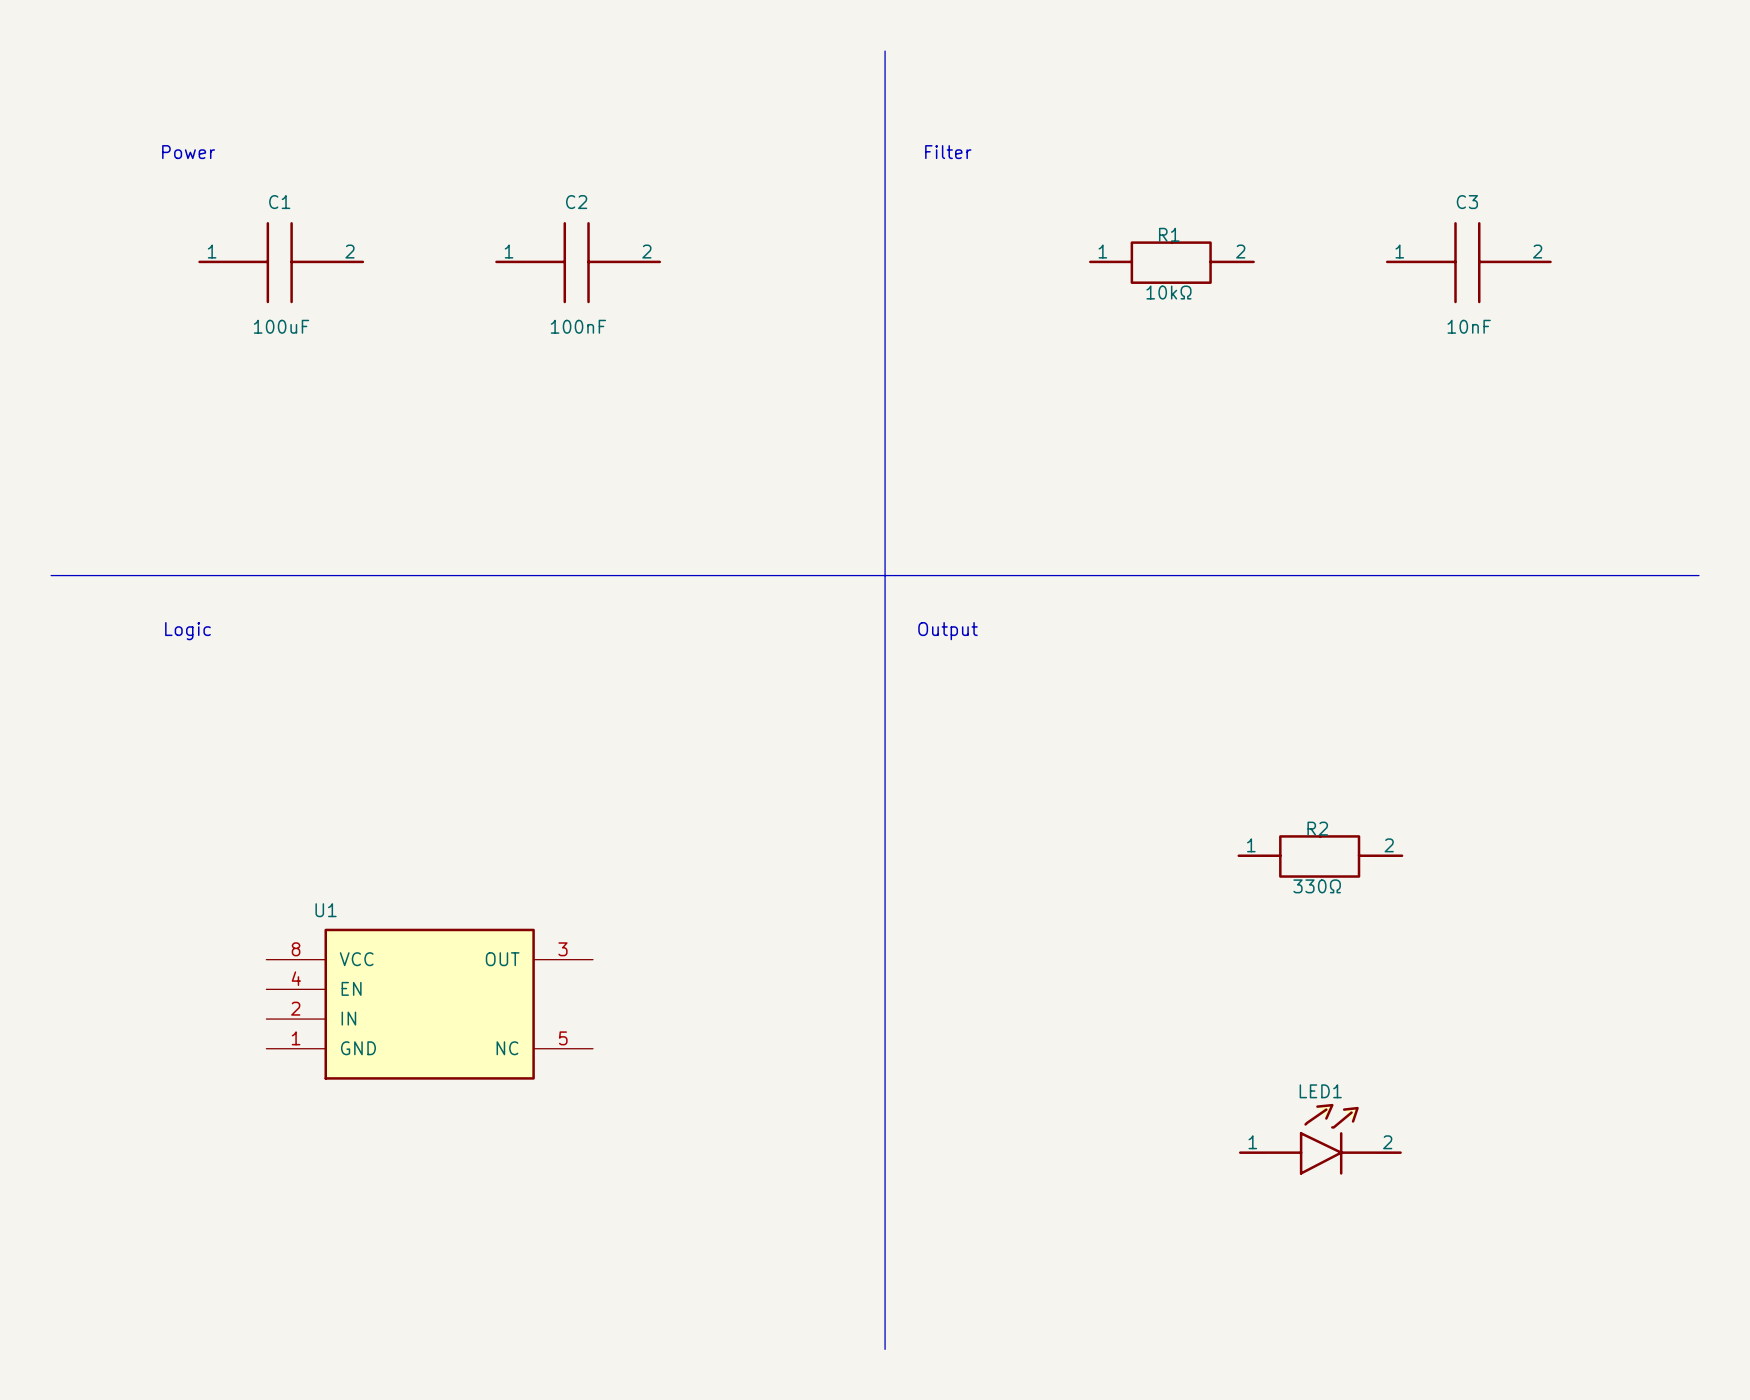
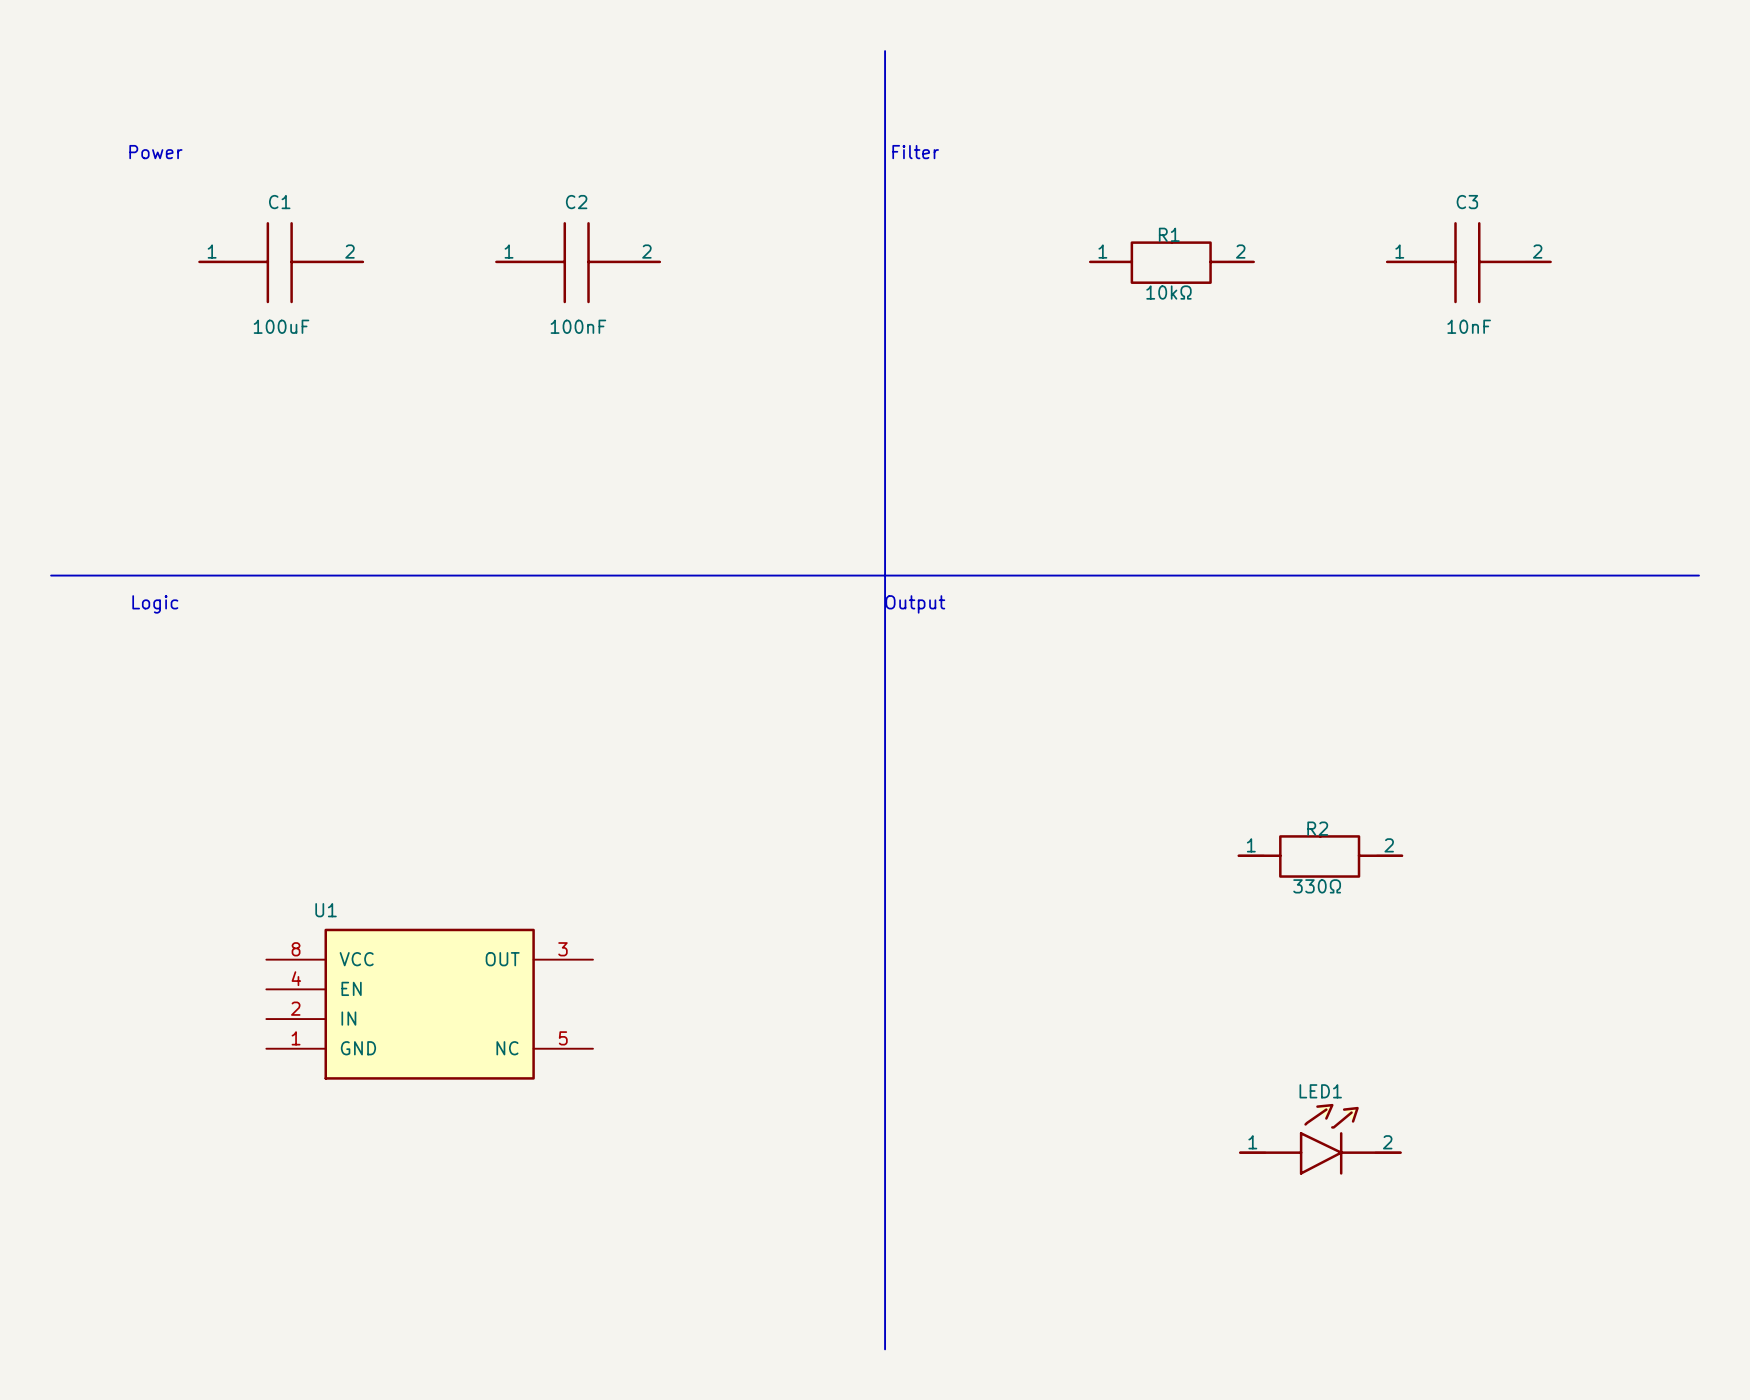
text position: Power (188, 152) -> Power (155, 152)
text position: Filter (948, 152) -> Filter (915, 152)
text position: Logic (187, 631) -> Logic (155, 604)
text position: Output (948, 631) -> Output (915, 604)

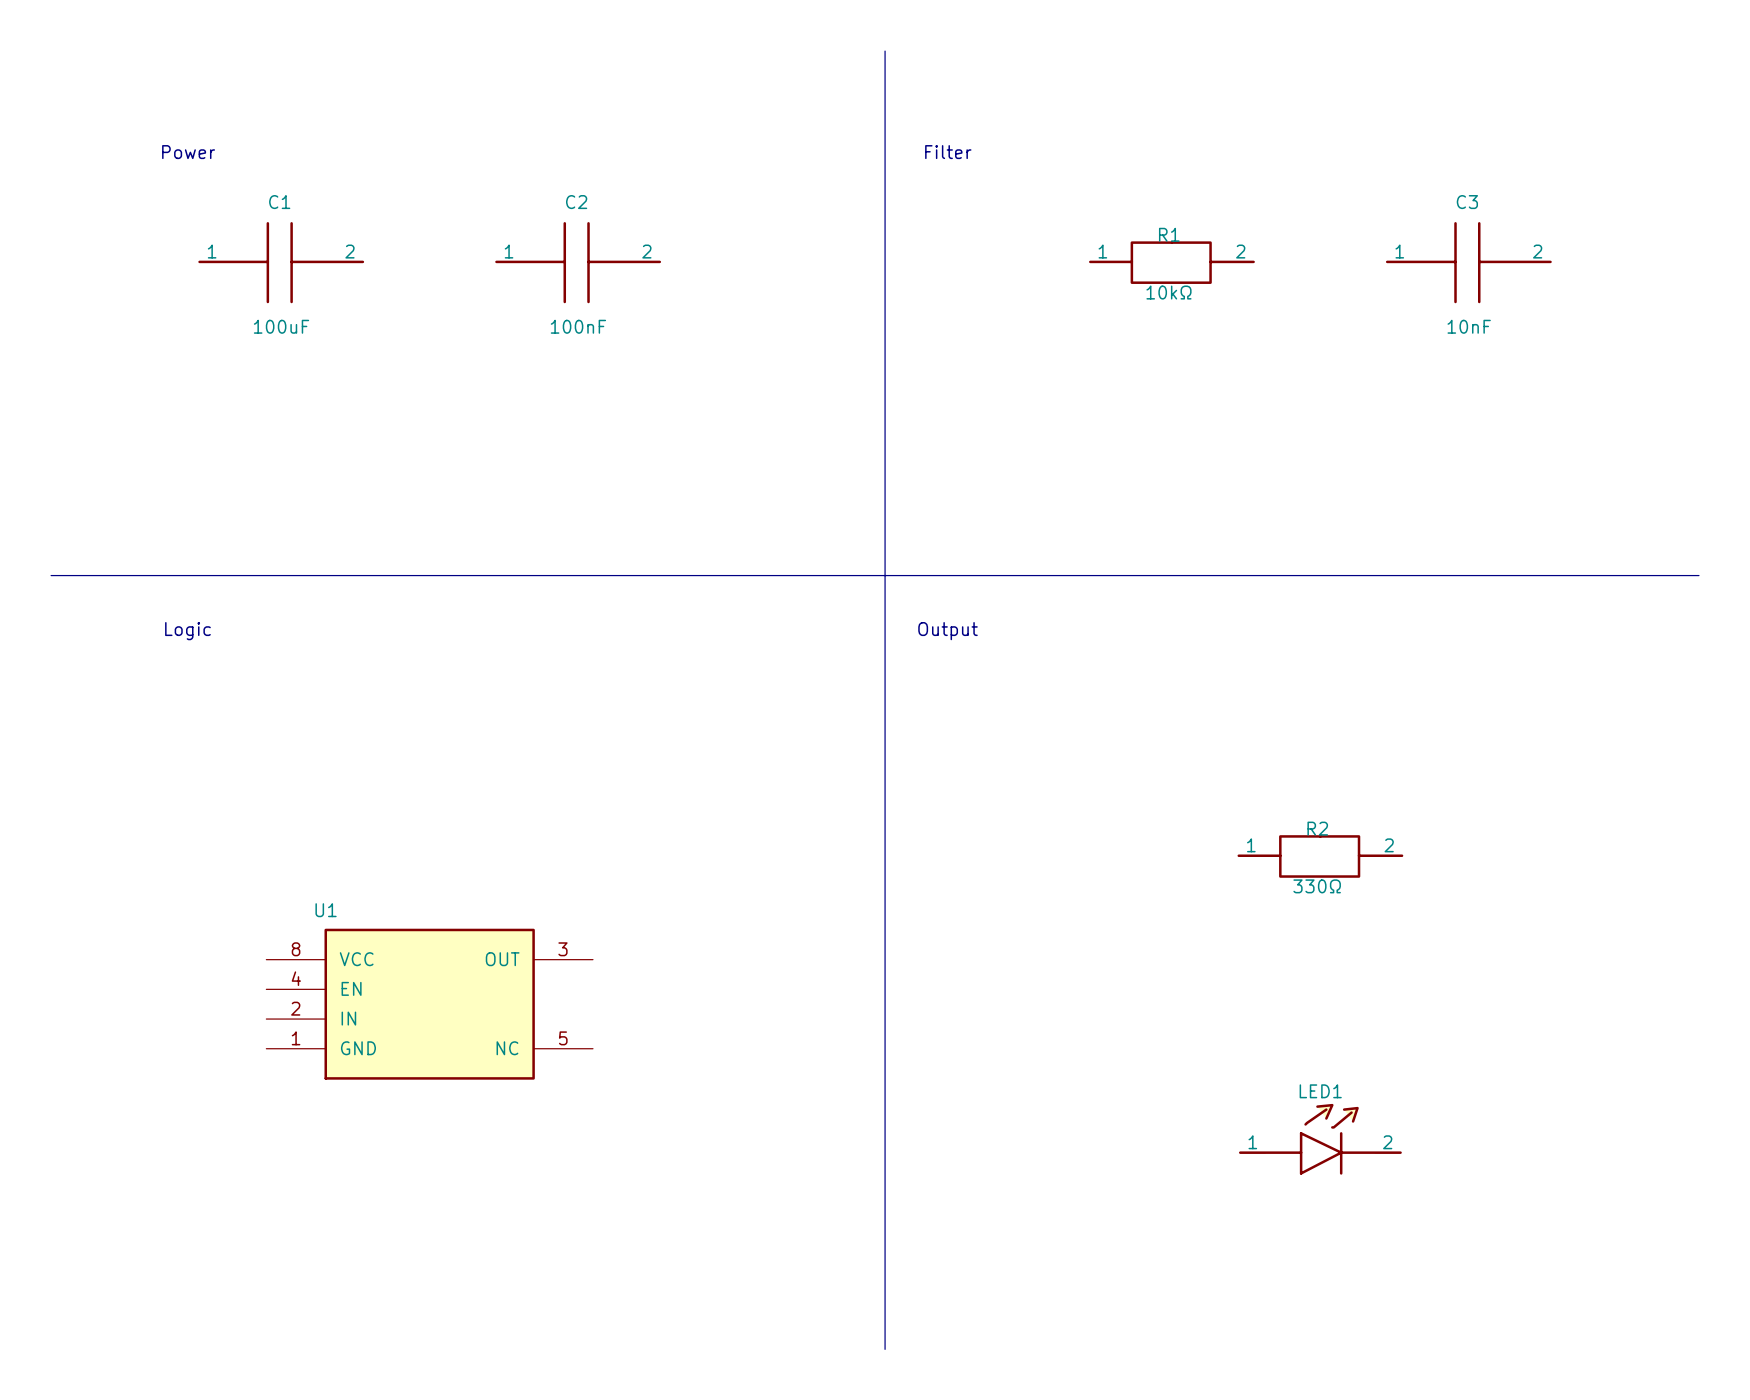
text position: Power (155, 152) -> Power (188, 152)
text position: Filter (915, 152) -> Filter (948, 152)
text position: Logic (155, 604) -> Logic (187, 631)
text position: Output (915, 604) -> Output (948, 631)

